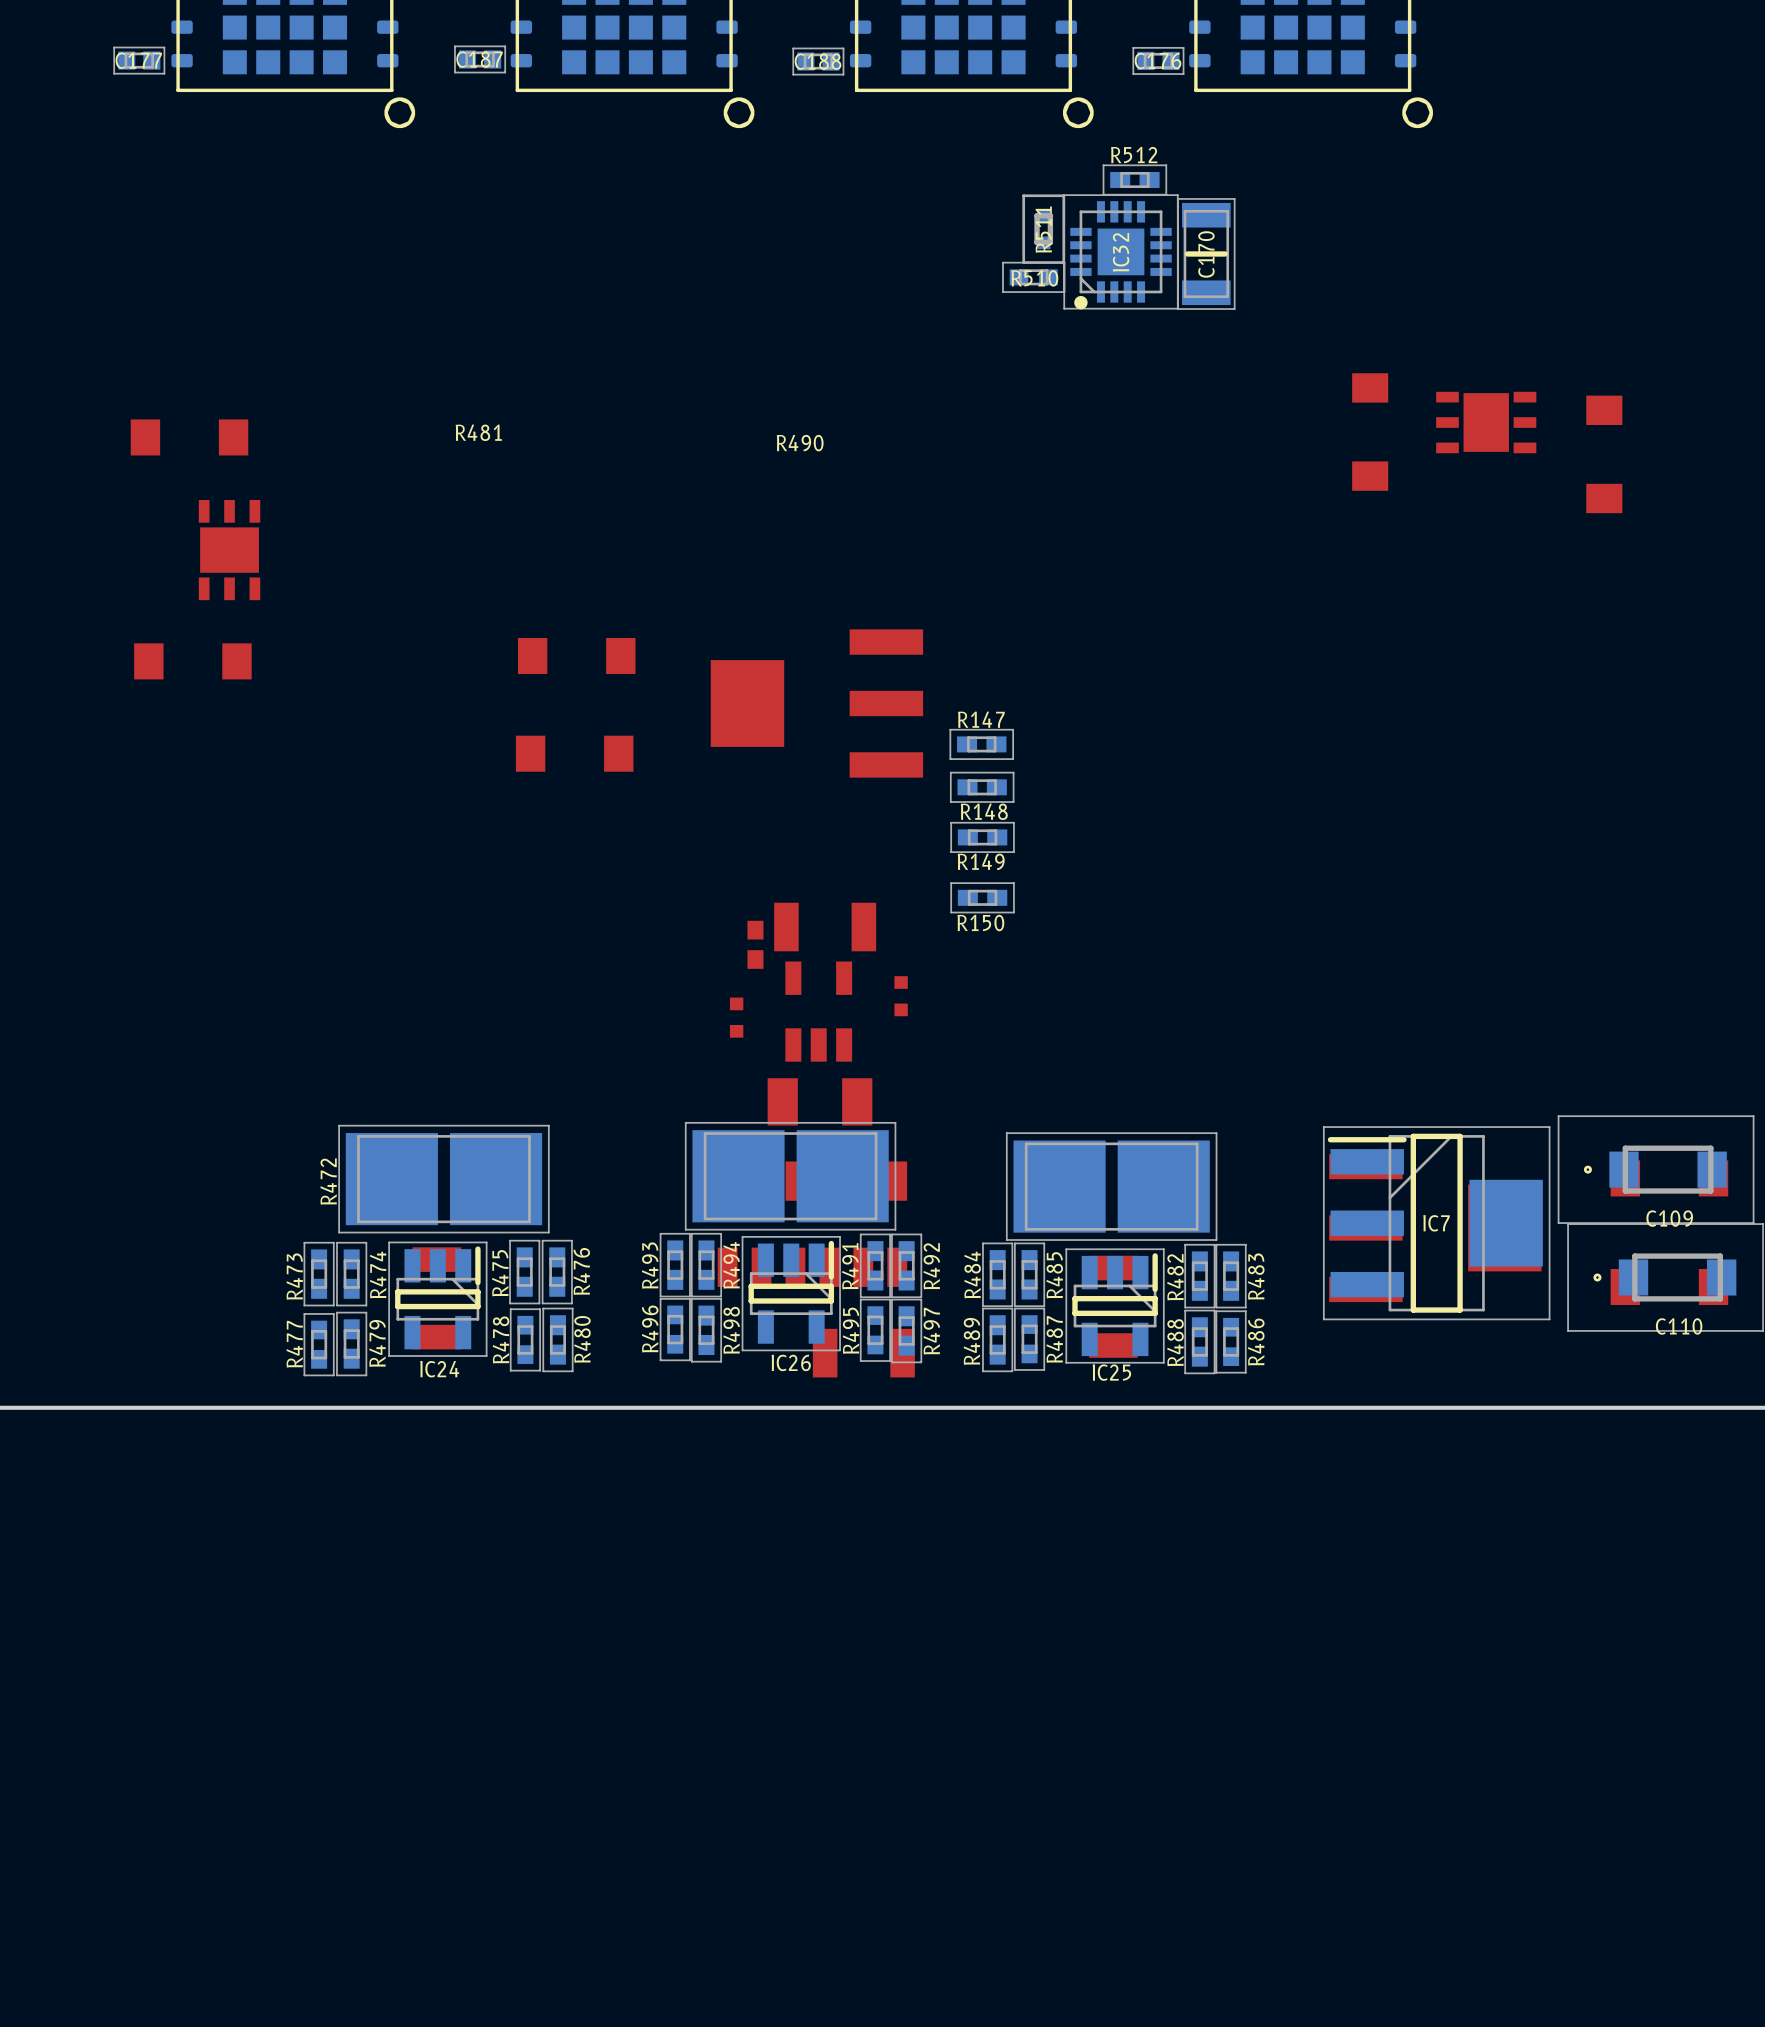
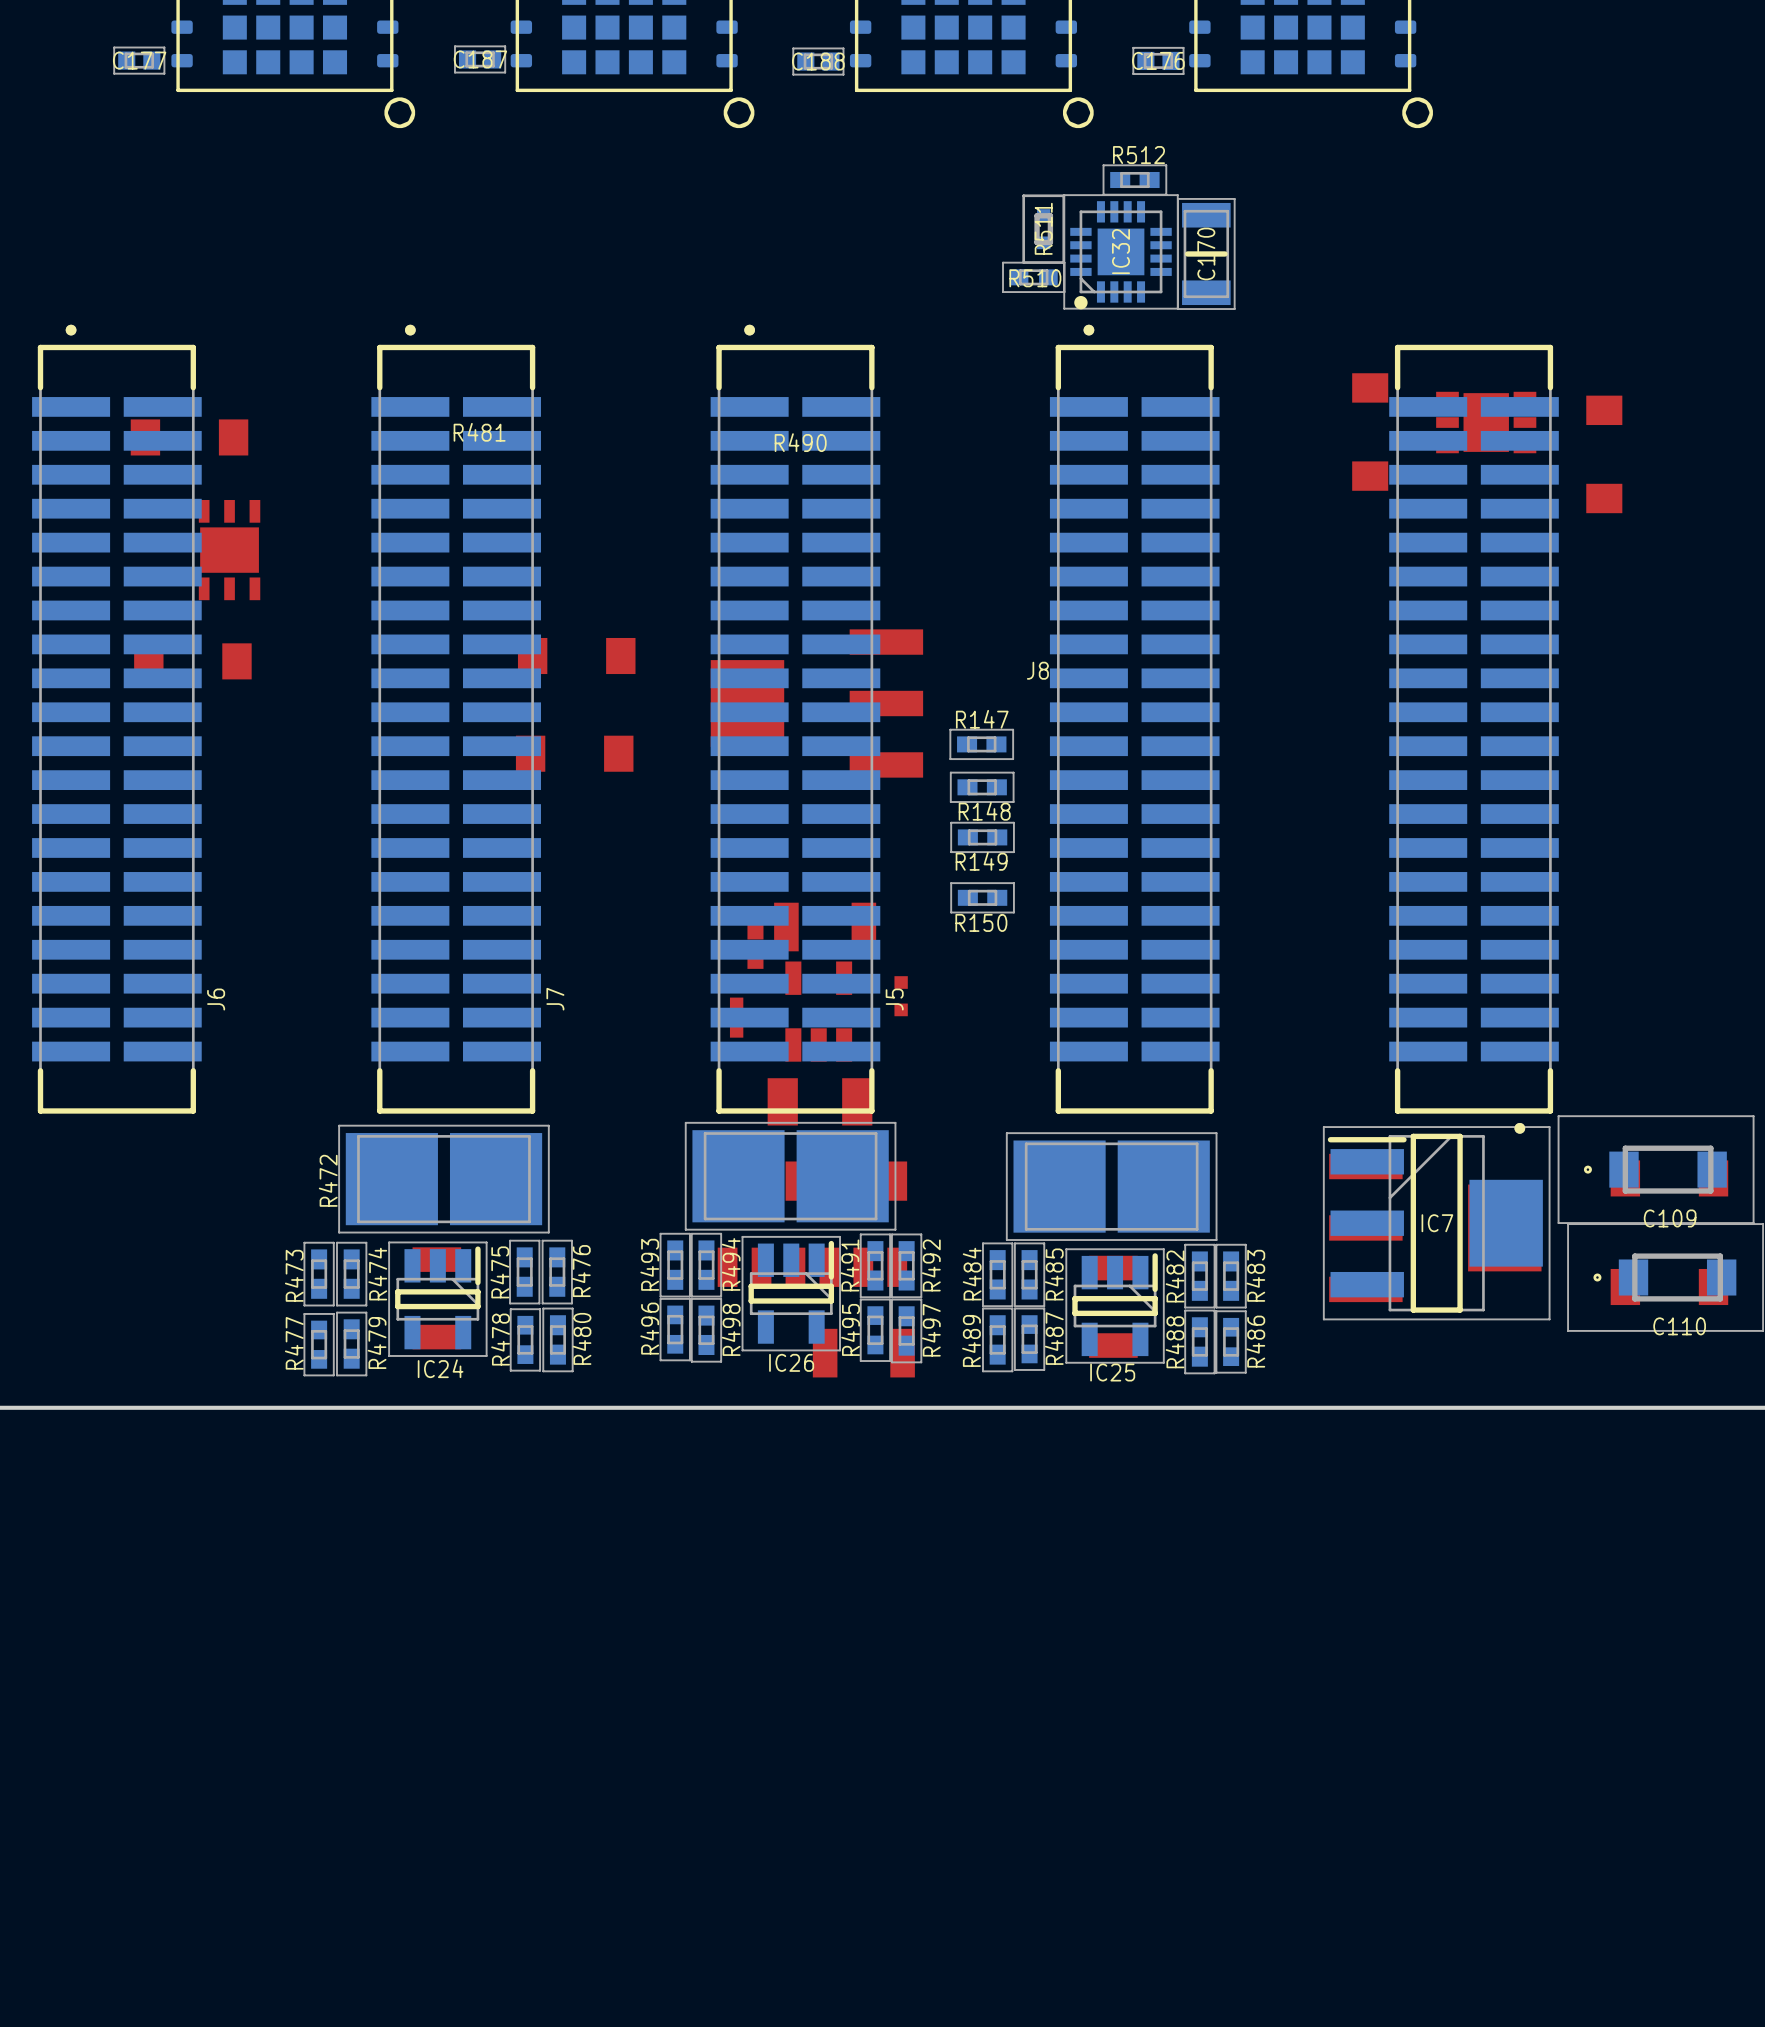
J6: none -> (116, 719)
J7: none -> (456, 719)
J5: none -> (795, 719)
J8: none -> (1134, 719)
part: none -> (1474, 739)

